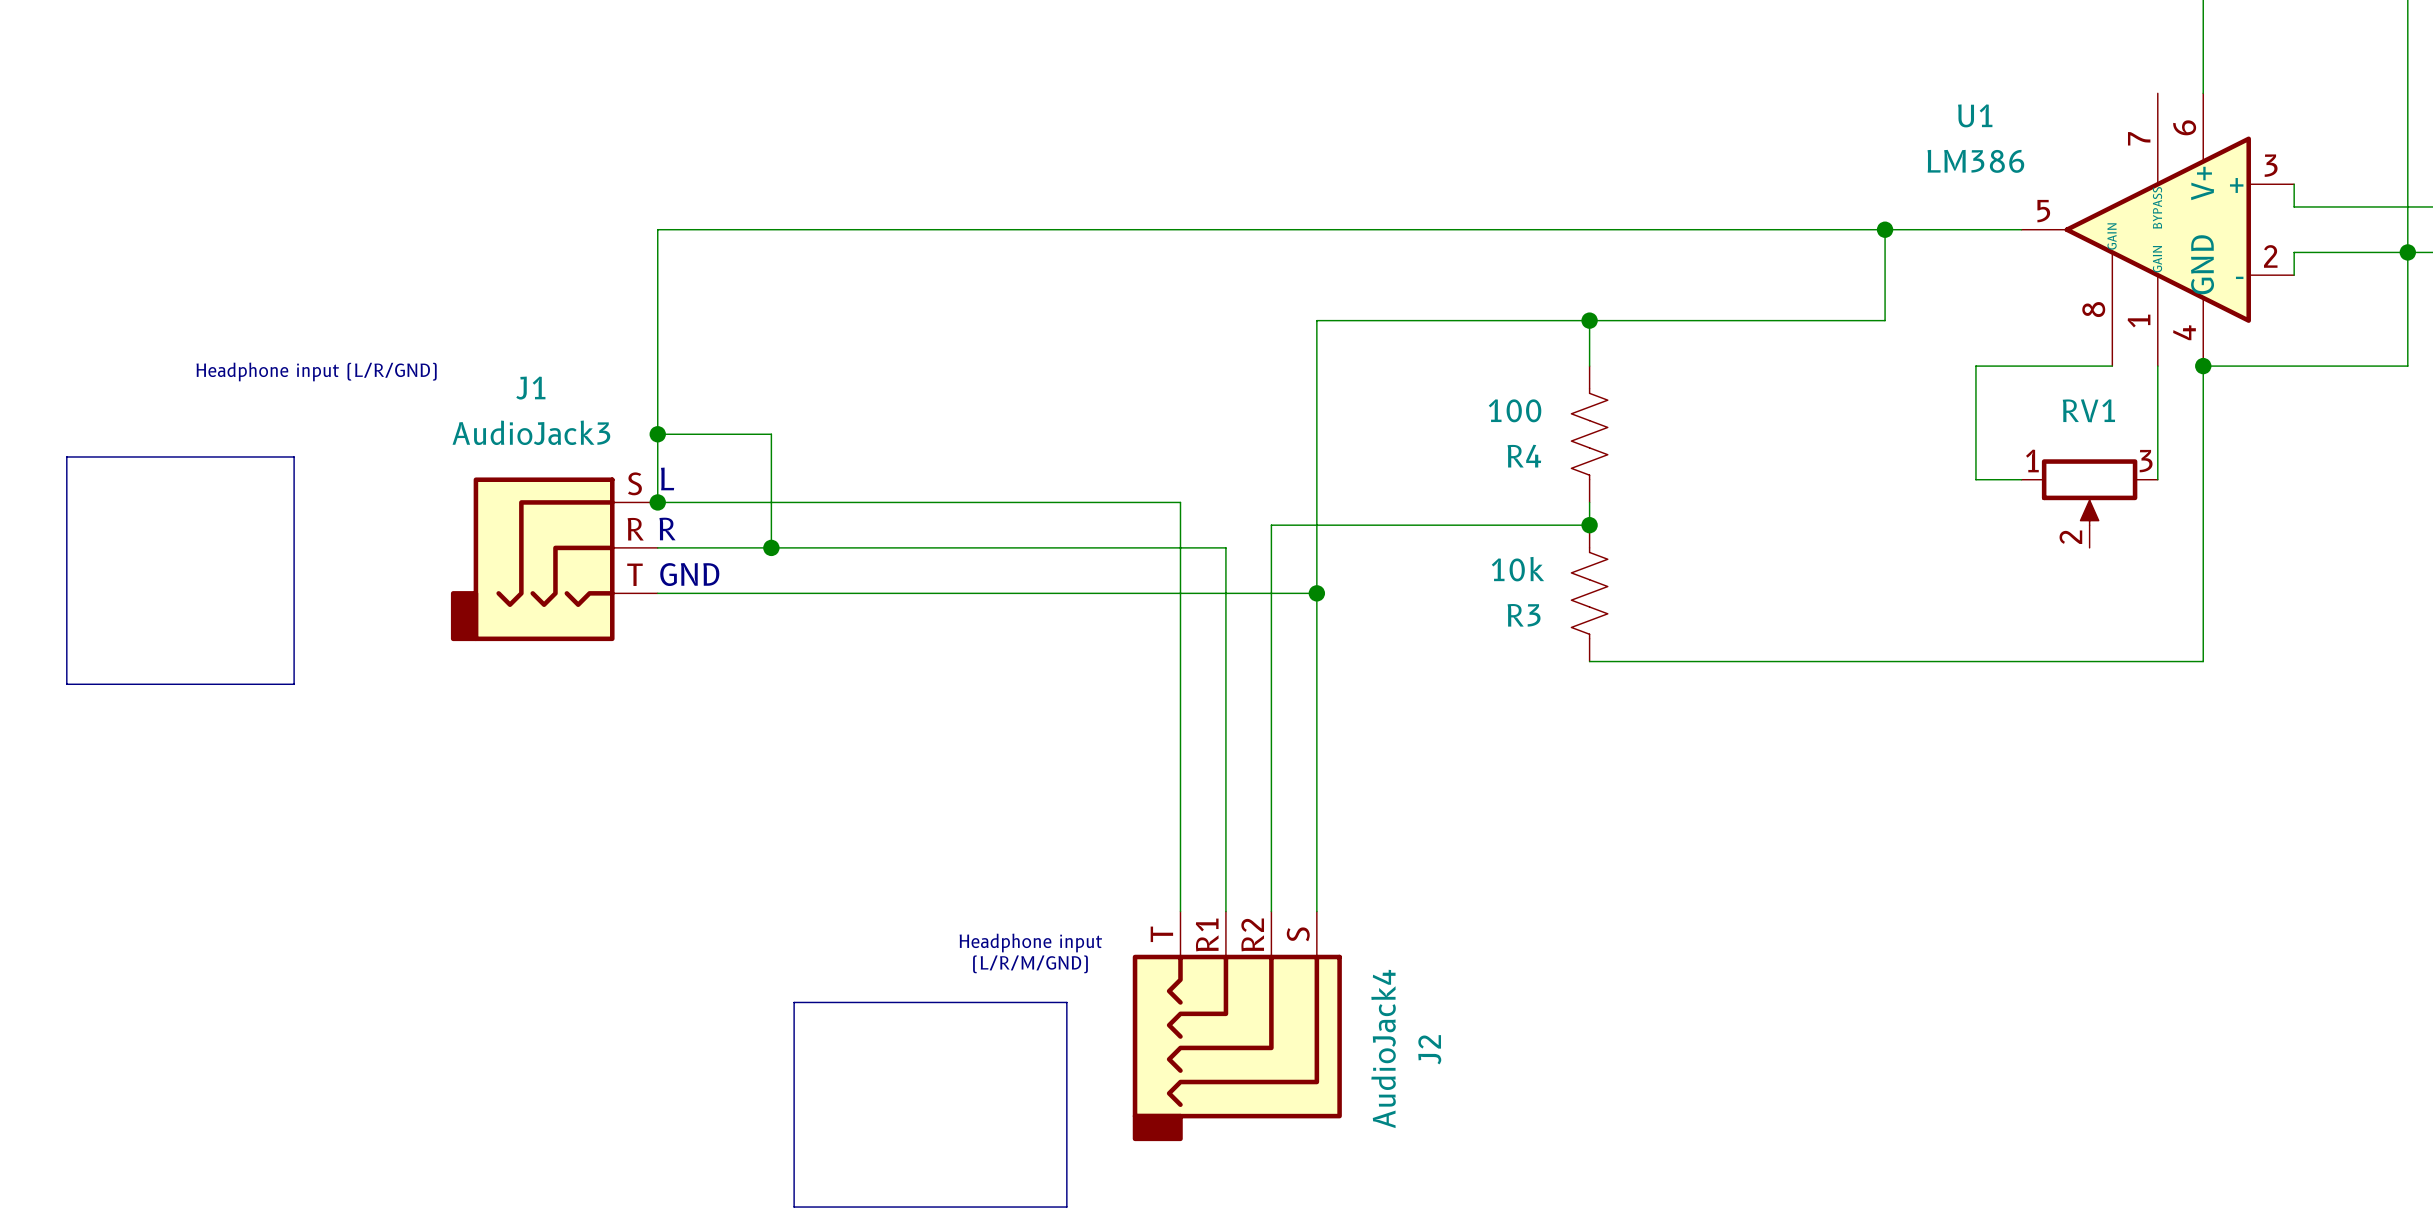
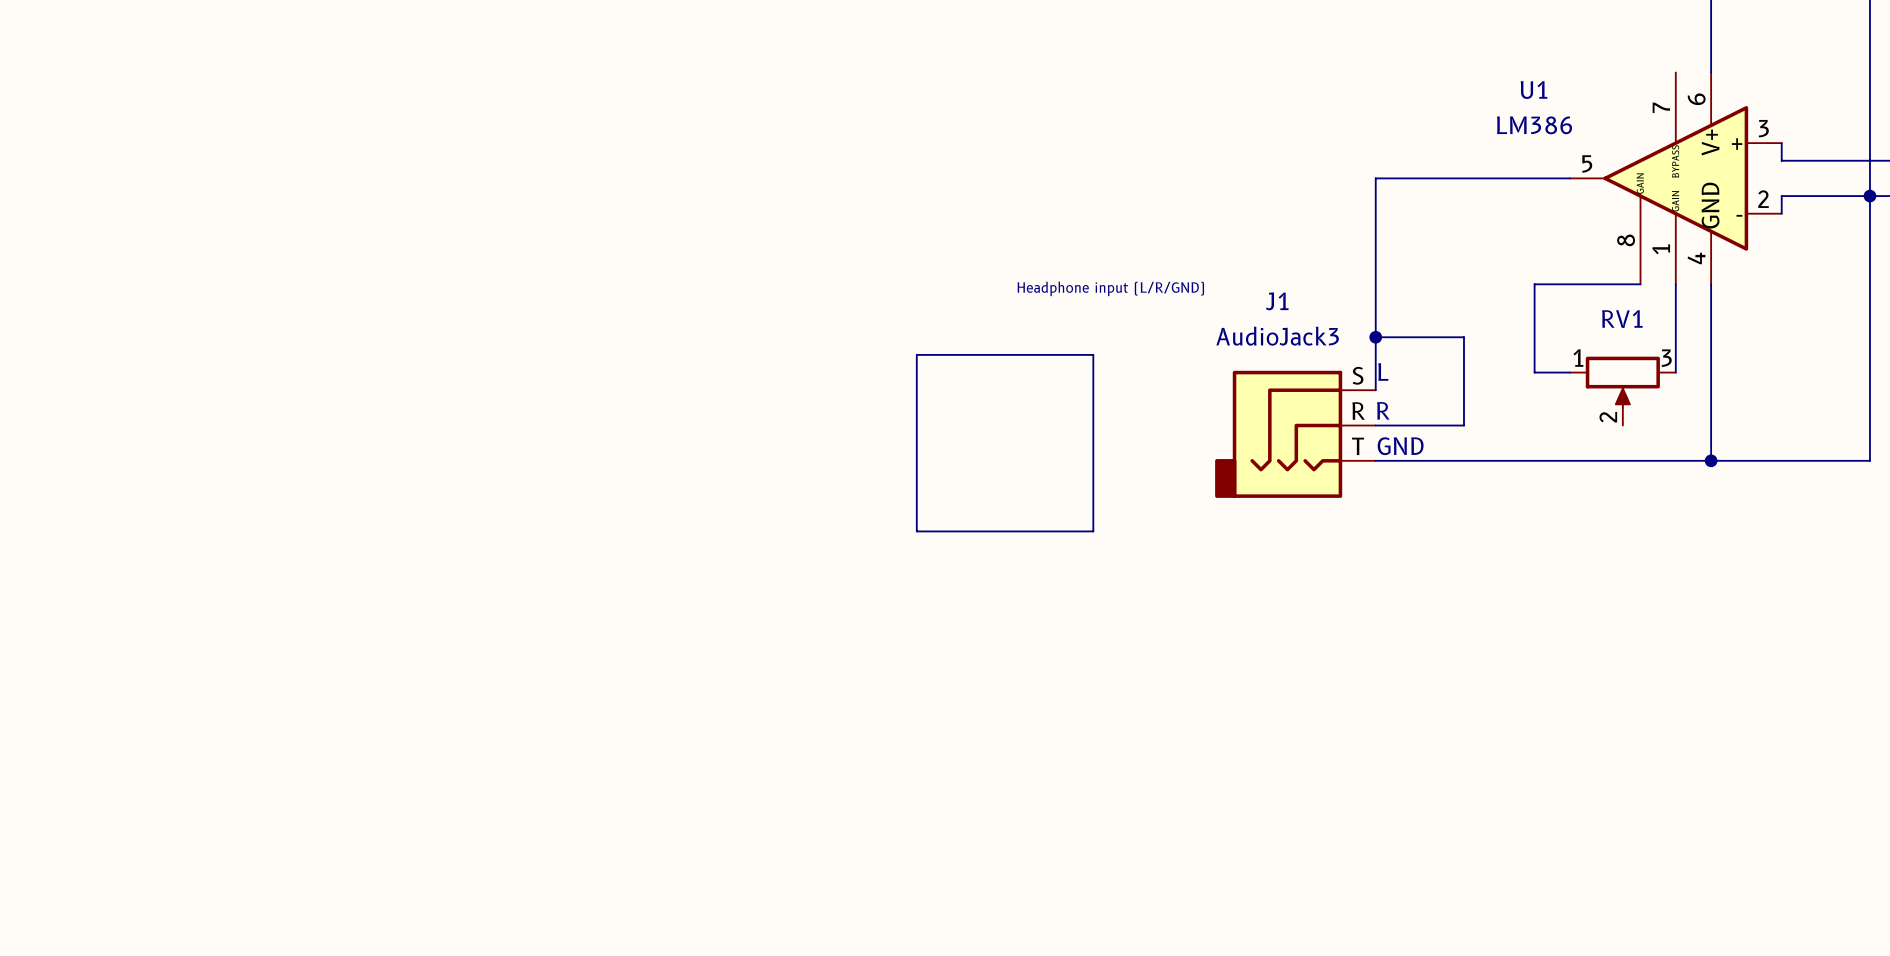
wire: (1771, 229) (657, 229) (657, 502) (1180, 502) (1180, 911) -> (1375, 178) (1375, 390)
wire: (1885, 229) (1885, 320) (1316, 320) (1316, 911) -> none
junction: (1885, 229) -> none
wire: (1589, 320) (1589, 366) -> none
junction: (1589, 320) -> none
wire: (2203, 366) (2407, 366) -> (1375, 460) (1869, 460) (1869, 284)
junction: (2203, 366) -> none
text: Headphone input (L/R/GND) (316, 371) -> none
text: none -> Headphone input (L/R/GND) (1110, 288)
wire: (657, 434) (771, 434) (771, 547) -> none
junction: (657, 434) -> none
R4: 100 (1589, 434) -> none
wire: none -> (1375, 337) (1463, 337) (1463, 425) (1375, 425)
junction: none -> (1375, 337)
line: (66, 456) (294, 456) (294, 684) (66, 684) (66, 456) -> none
line: none -> (916, 354) (1093, 354) (1093, 531) (916, 531) (916, 354)
text: L (667, 478) -> none
text: none -> L (1383, 371)
junction: (657, 502) -> none
wire: (1589, 502) (1589, 525) (1271, 525) (1271, 911) -> none
junction: (1589, 525) -> none
text: R (667, 529) -> none
text: none -> R (1383, 410)
wire: (657, 547) (1225, 547) (1225, 911) -> none
junction: (771, 547) -> none
J1 position: (554, 559) -> (1295, 434)
text: GND (689, 574) -> none
text: none -> GND (1400, 446)
wire: (657, 593) (1316, 593) -> none
junction: (1316, 593) -> none
R3: 10k (1589, 593) -> none
wire: (2203, 593) (2203, 661) (1589, 661) -> none
junction: none -> (1711, 460)
text: Headphone input (1030, 942) -> none
text: (L/R/M/GND) (1030, 964) -> none
line: (794, 1002) (1066, 1002) (1066, 1207) (794, 1207) (794, 1002) -> none
J2: AudioJack4 (1237, 1026) -> none

